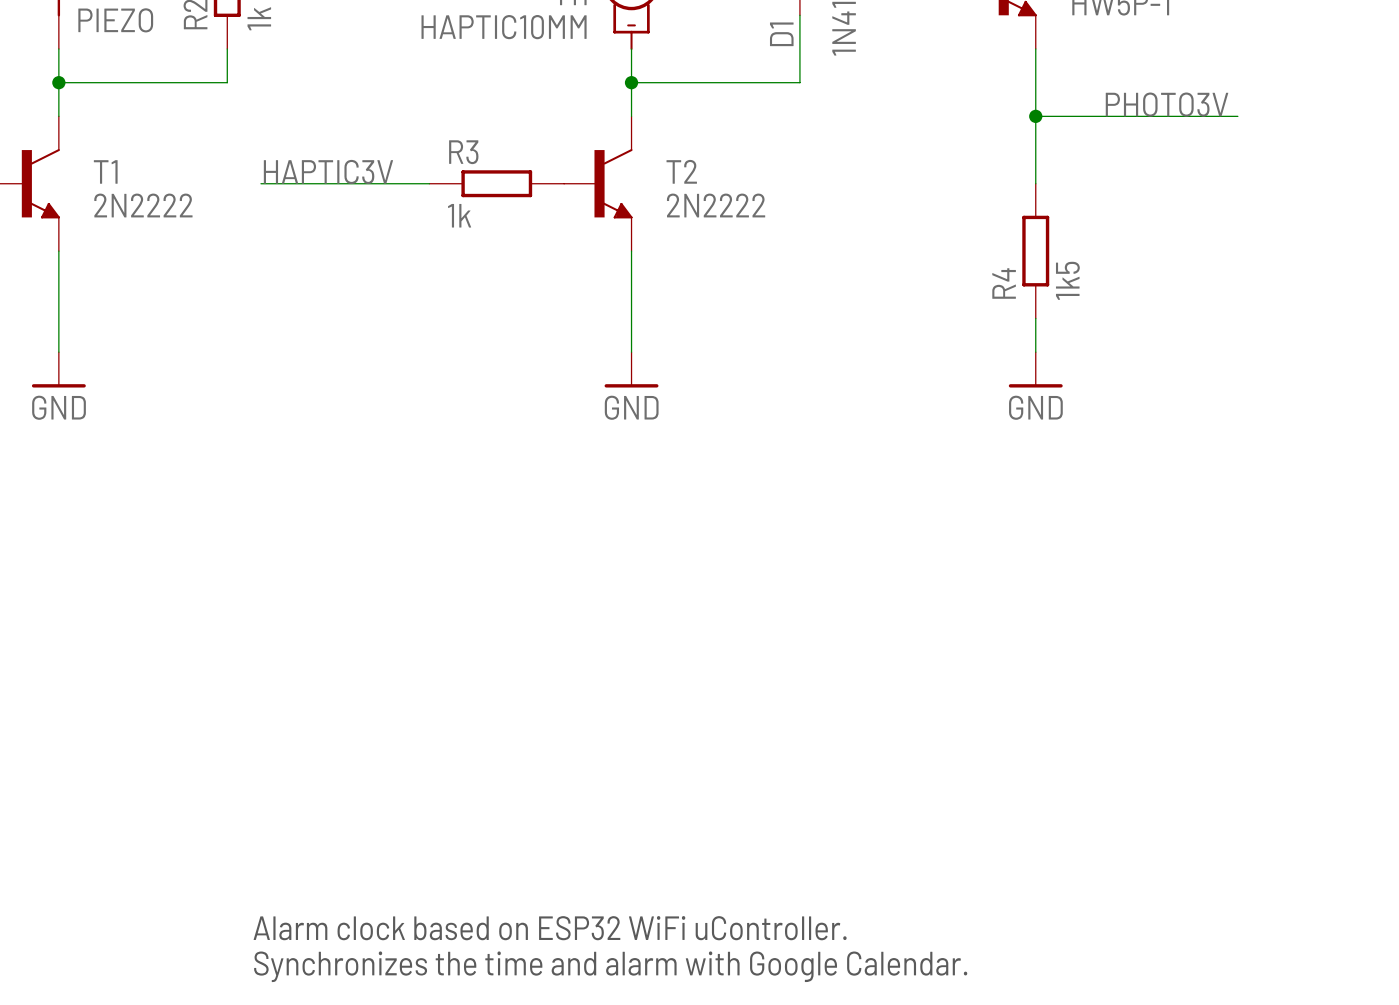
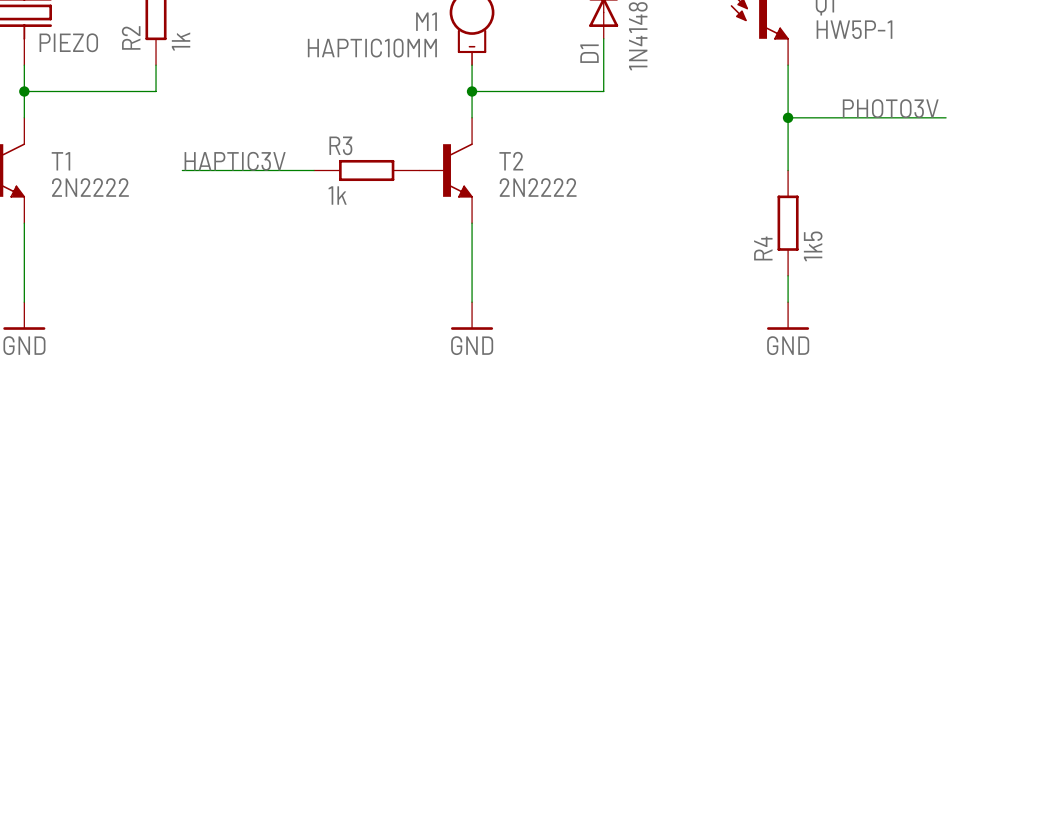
text: Alarm clock based on ESP32 WiFi uController. (550, 928) -> none
text: Synchronizes the time and alarm with Google Calendar. (610, 966) -> none

